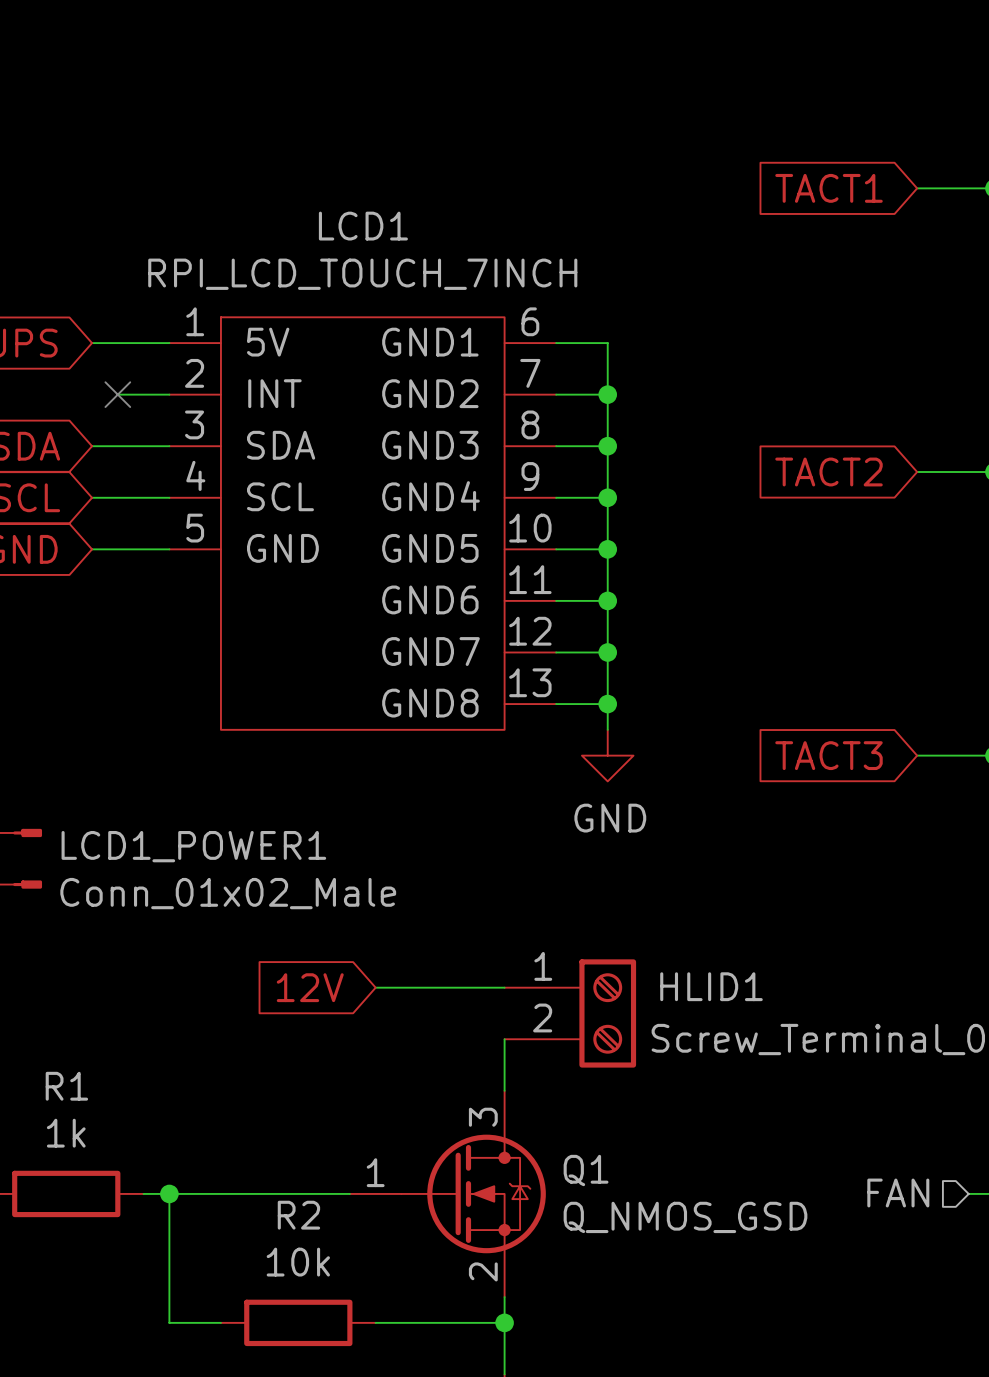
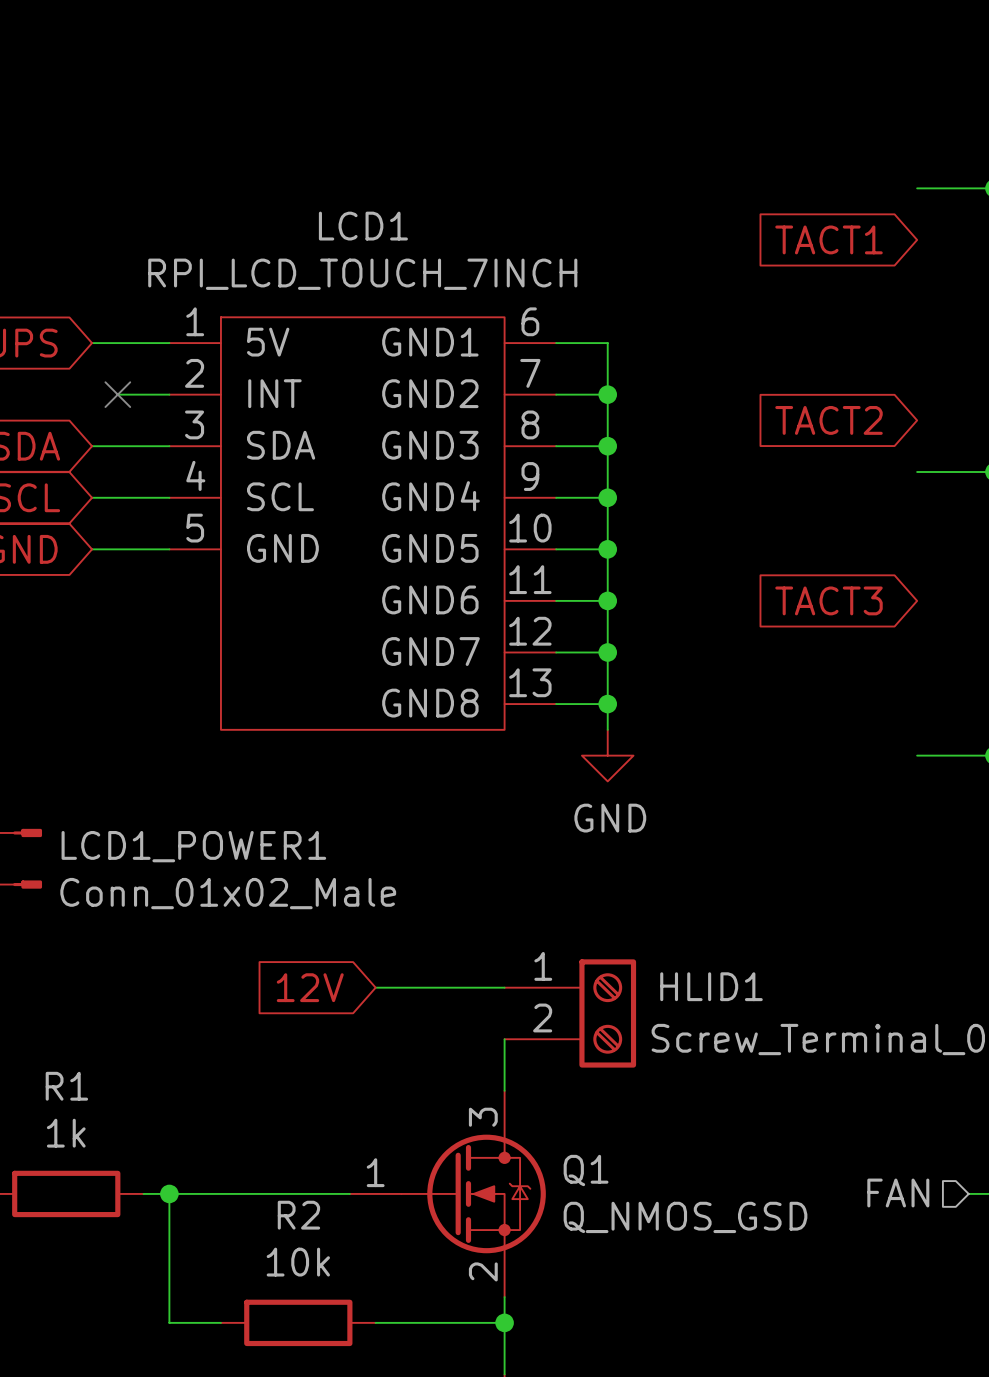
global label position: TACT1 (829, 188) -> TACT1 (829, 239)
global label position: TACT2 (829, 471) -> TACT2 (829, 420)
global label position: TACT3 (829, 755) -> TACT3 (829, 600)

